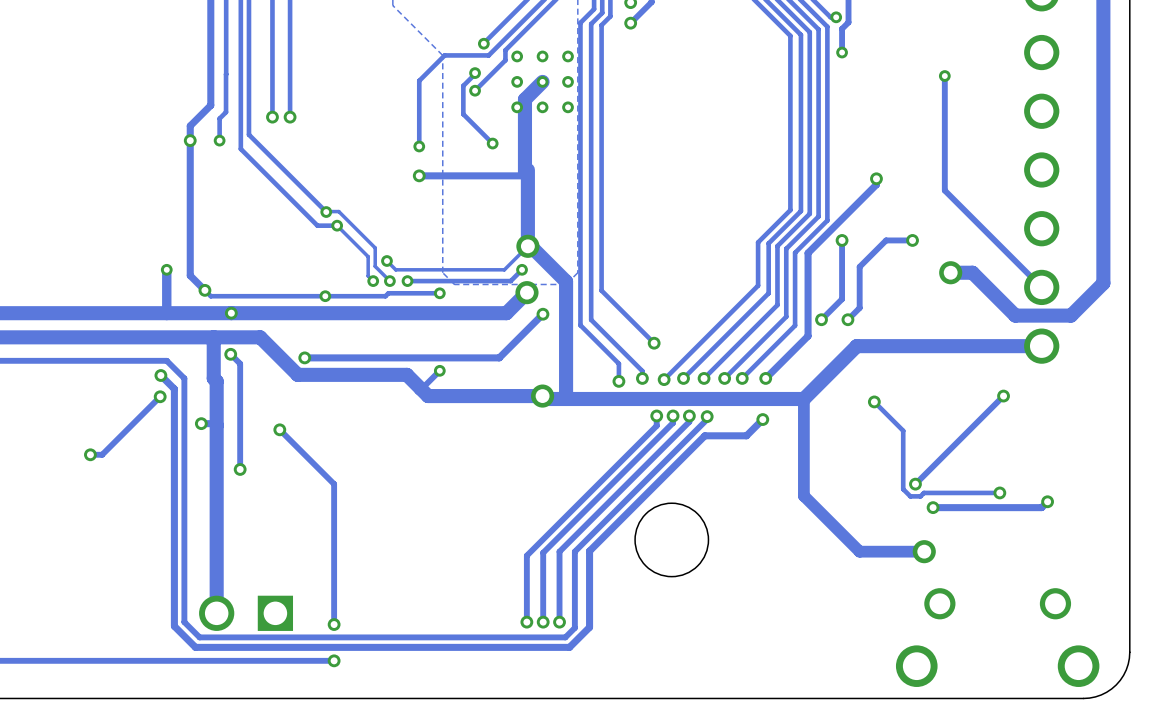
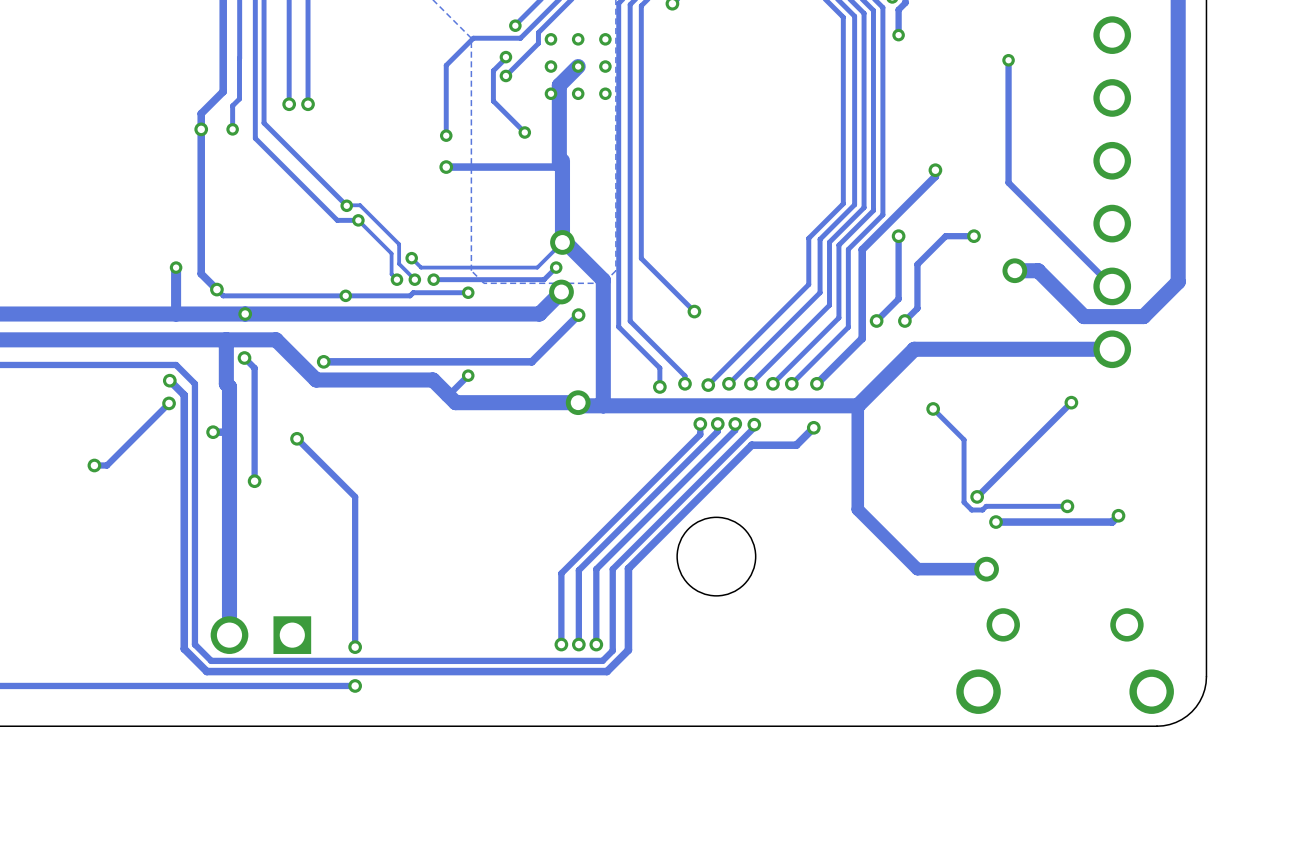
track: (601, 261) (601, 290) (654, 343) -> (641, 258) (694, 311)
via position: (654, 343) -> (694, 311)

